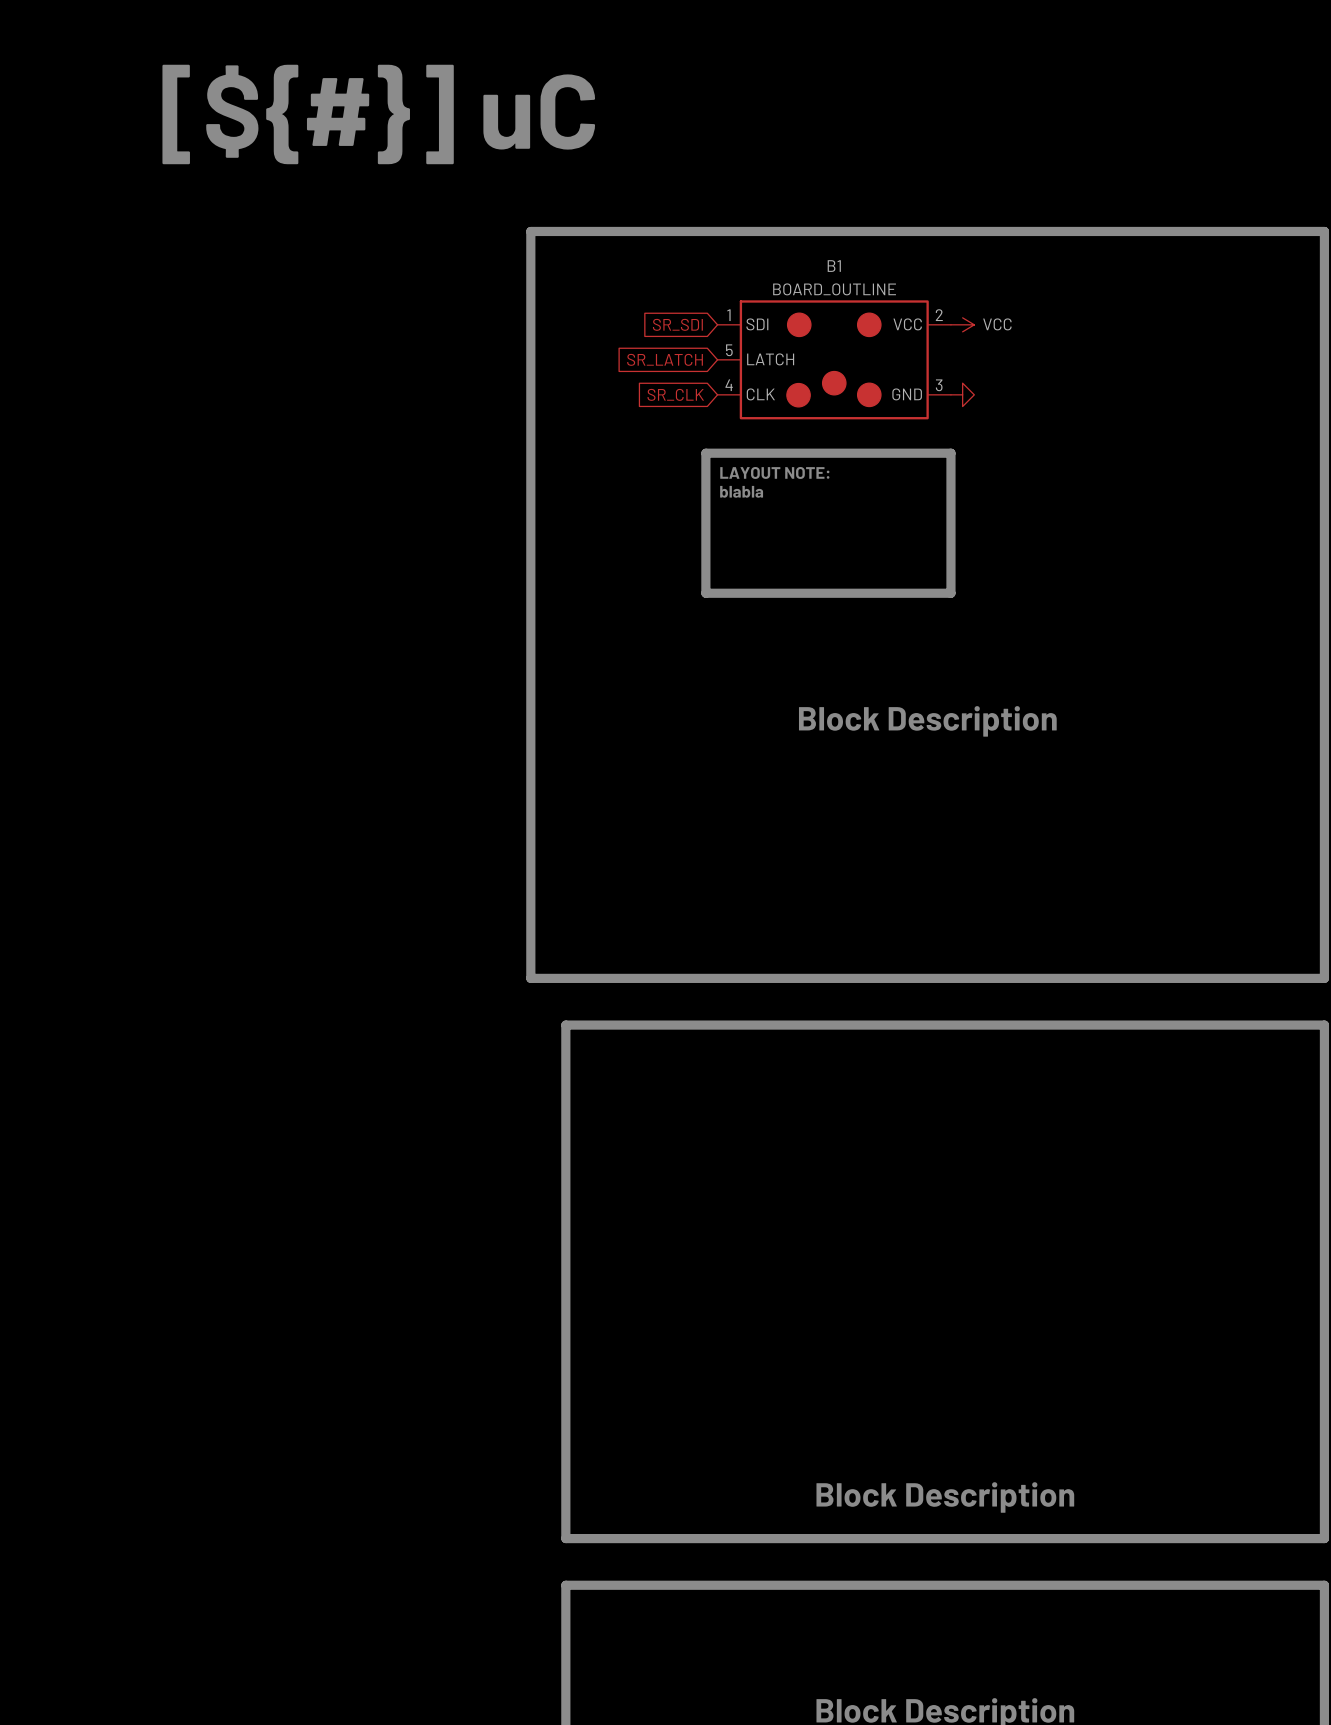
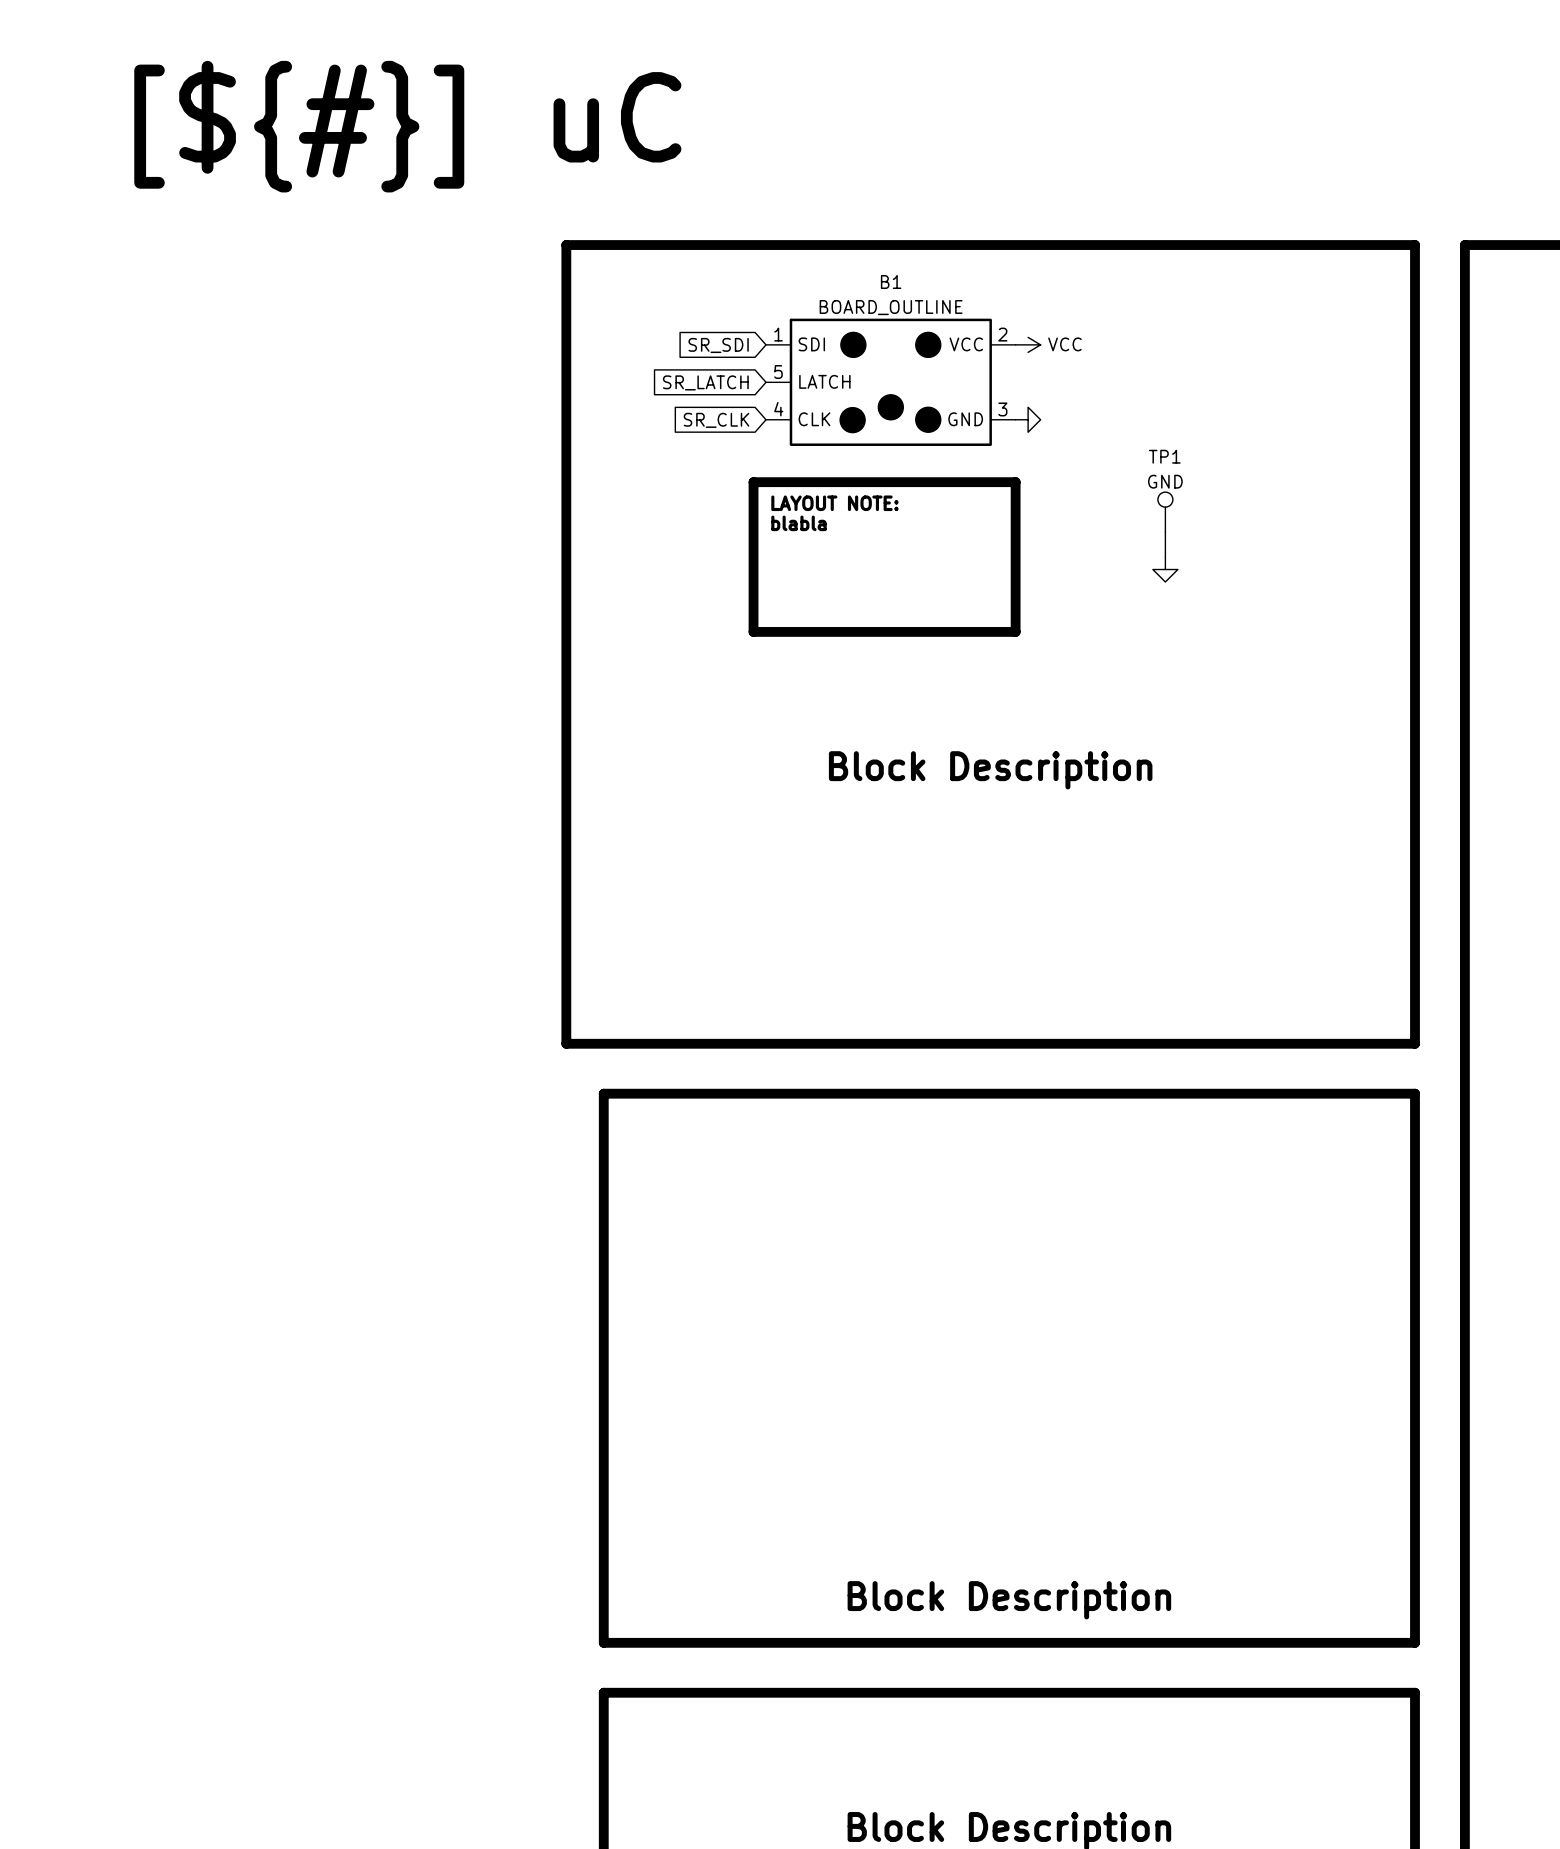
TP1: none -> GND (1165, 512)
wire: none -> (1165, 532) (1165, 557)
power symbol: none -> (1165, 569)

